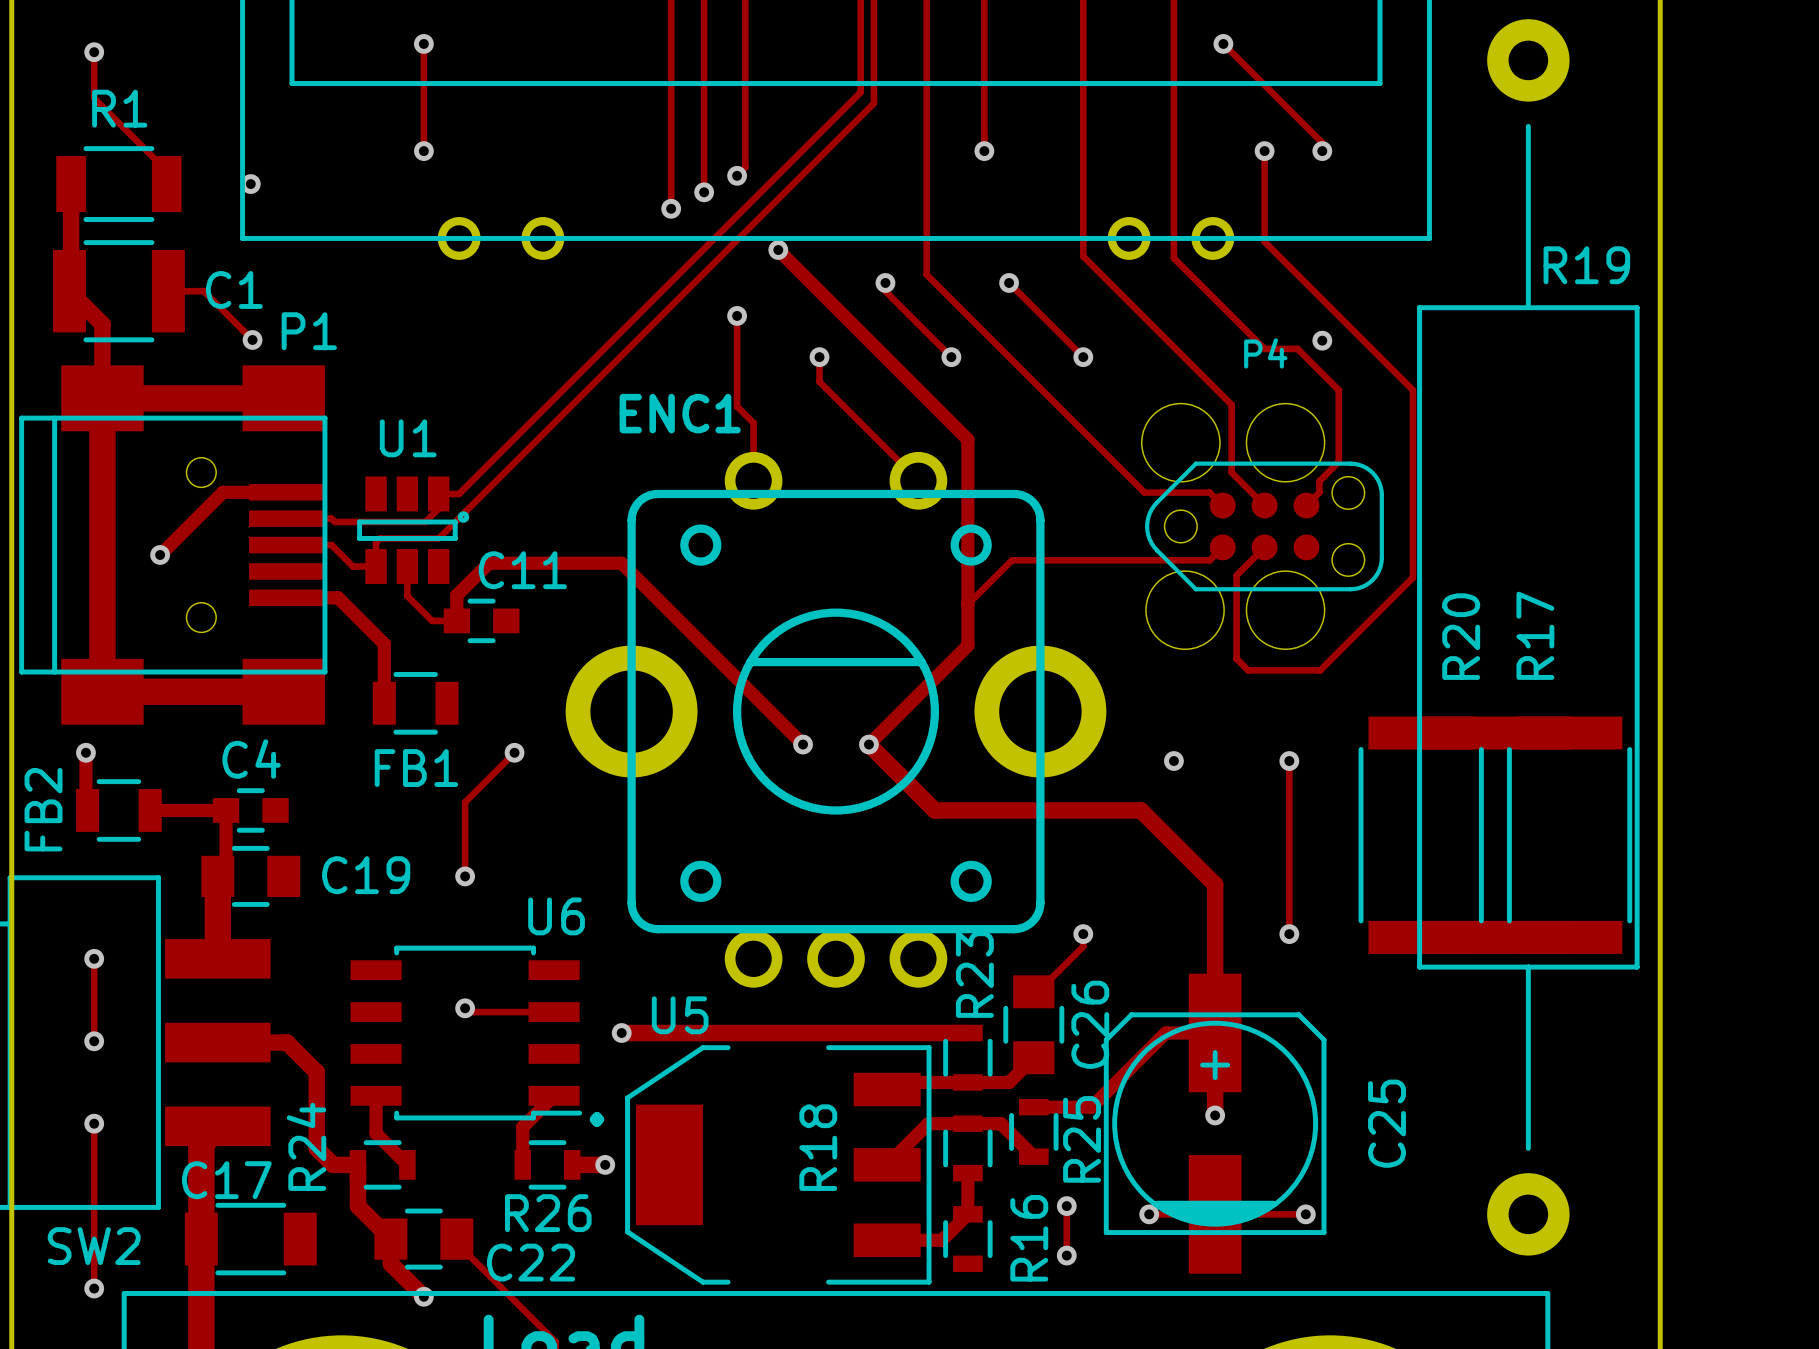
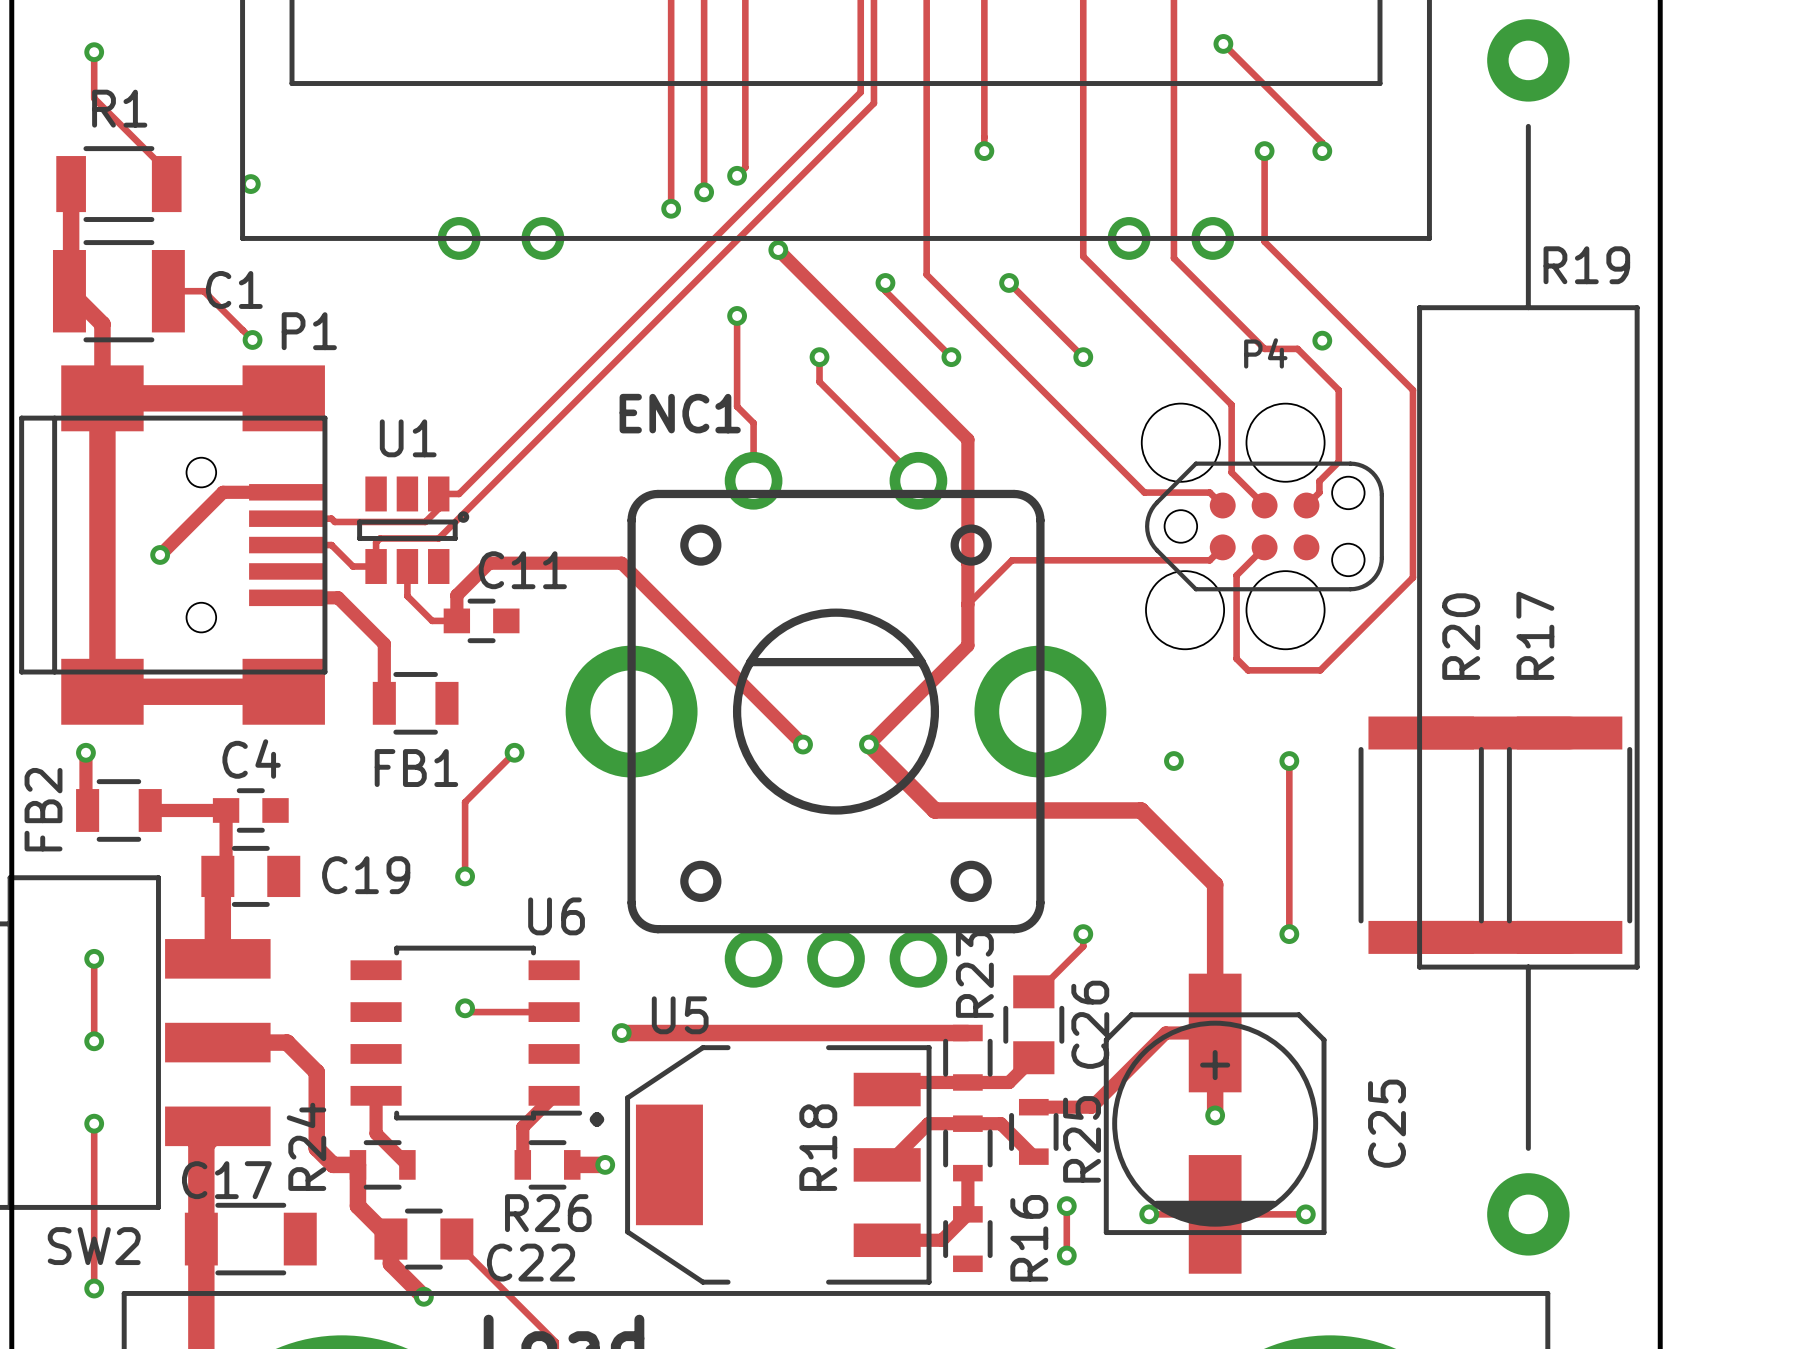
track: (423, 43) (423, 151) -> none
via: (423, 43) -> none
via: (423, 151) -> none

